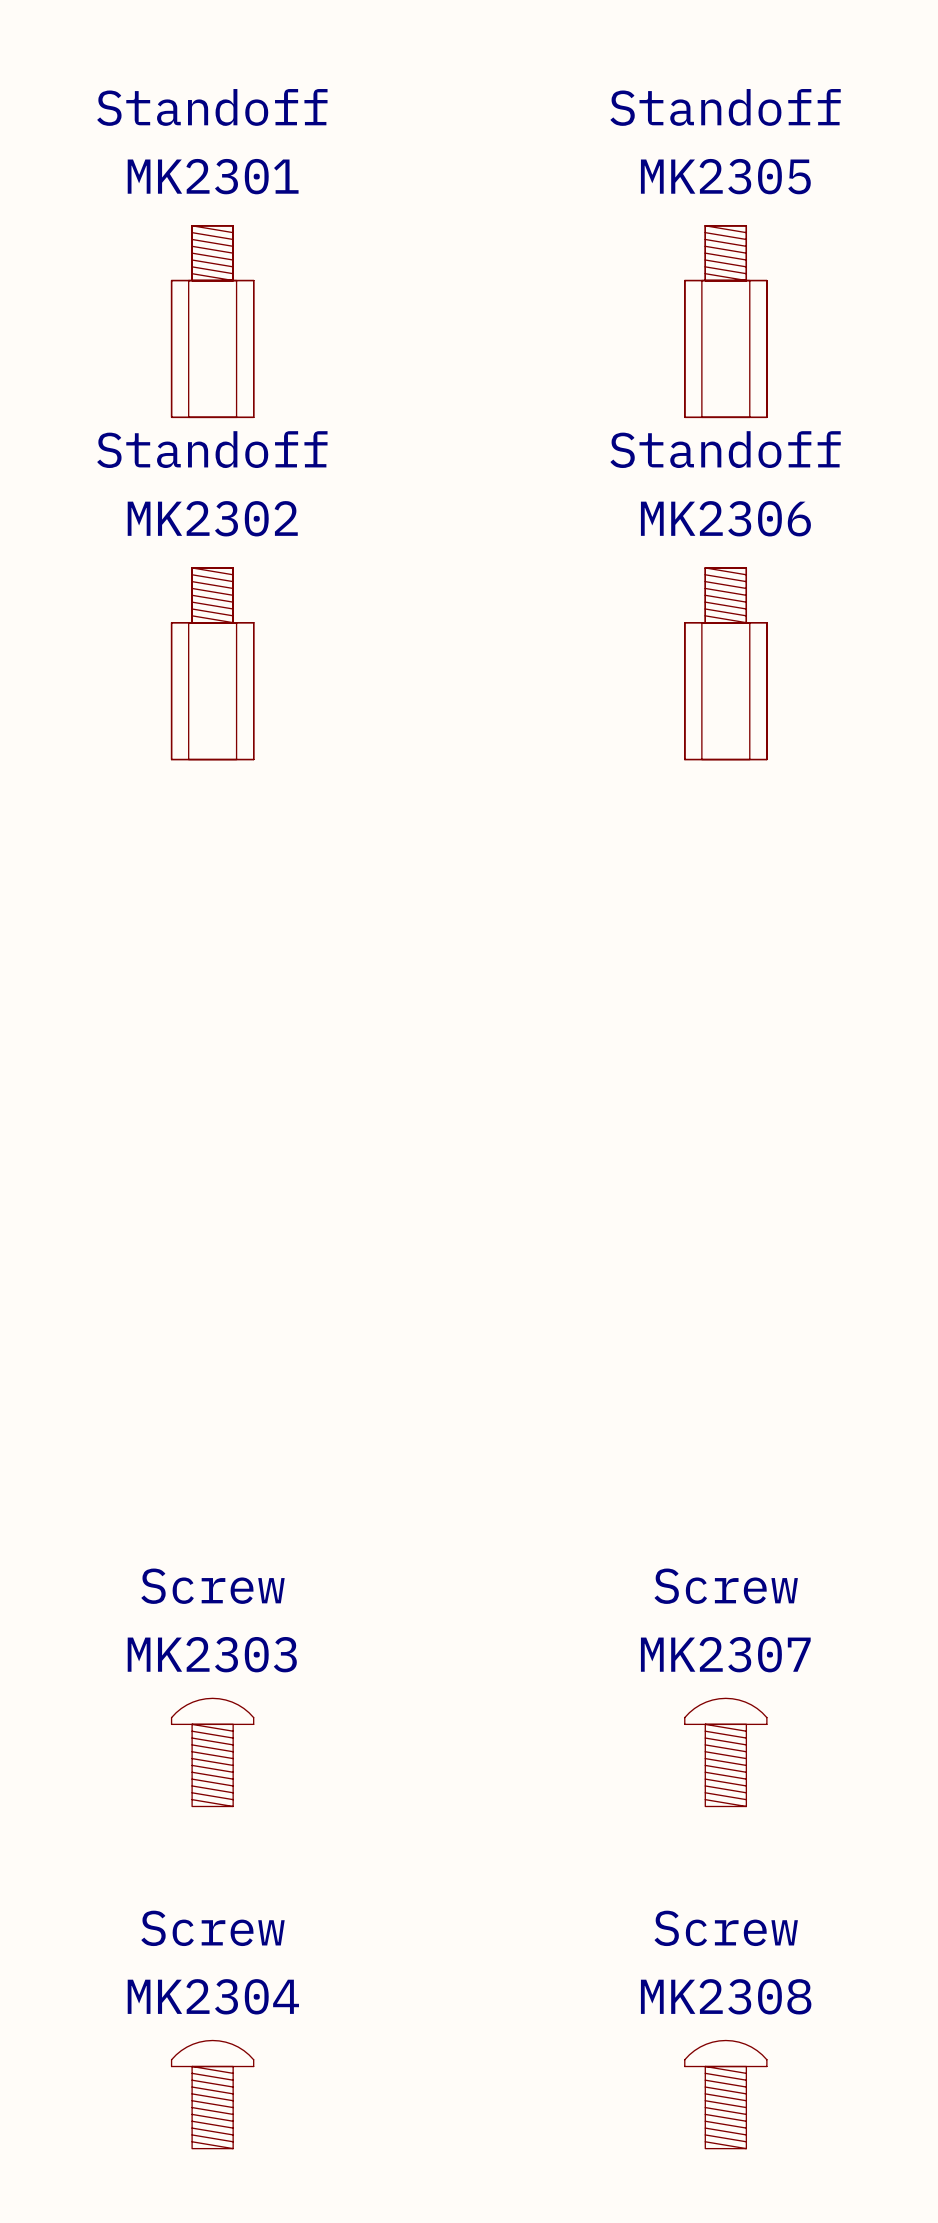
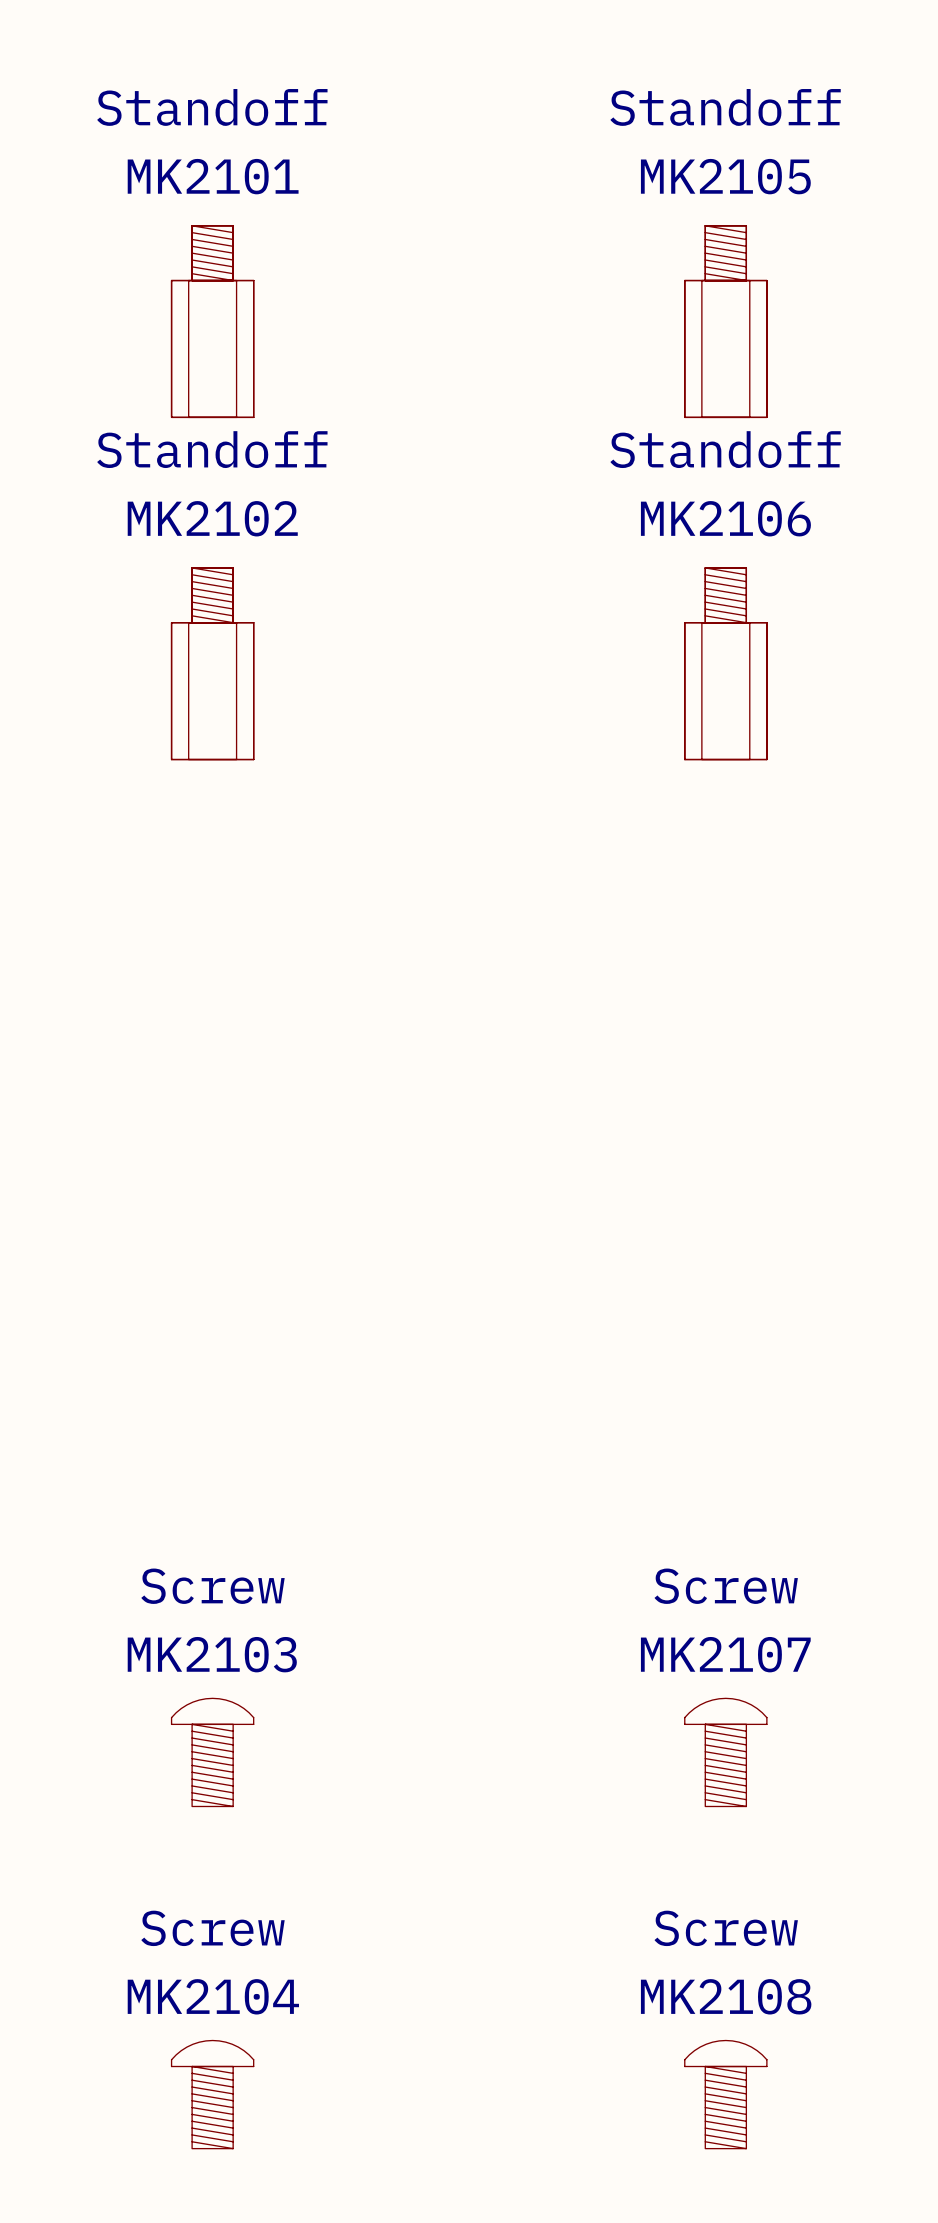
MK2301 name: MK2301 (213, 176) -> MK2101 (213, 176)
MK2305 name: MK2305 (725, 176) -> MK2105 (725, 176)
MK2302 name: MK2302 (212, 518) -> MK2102 (212, 518)
MK2306 name: MK2306 (725, 518) -> MK2106 (725, 518)
MK2303 name: MK2303 (212, 1654) -> MK2103 (212, 1654)
MK2307 name: MK2307 (725, 1654) -> MK2107 (725, 1654)
MK2304 name: MK2304 (213, 1996) -> MK2104 (213, 1996)
MK2308 name: MK2308 (726, 1996) -> MK2108 (726, 1996)

